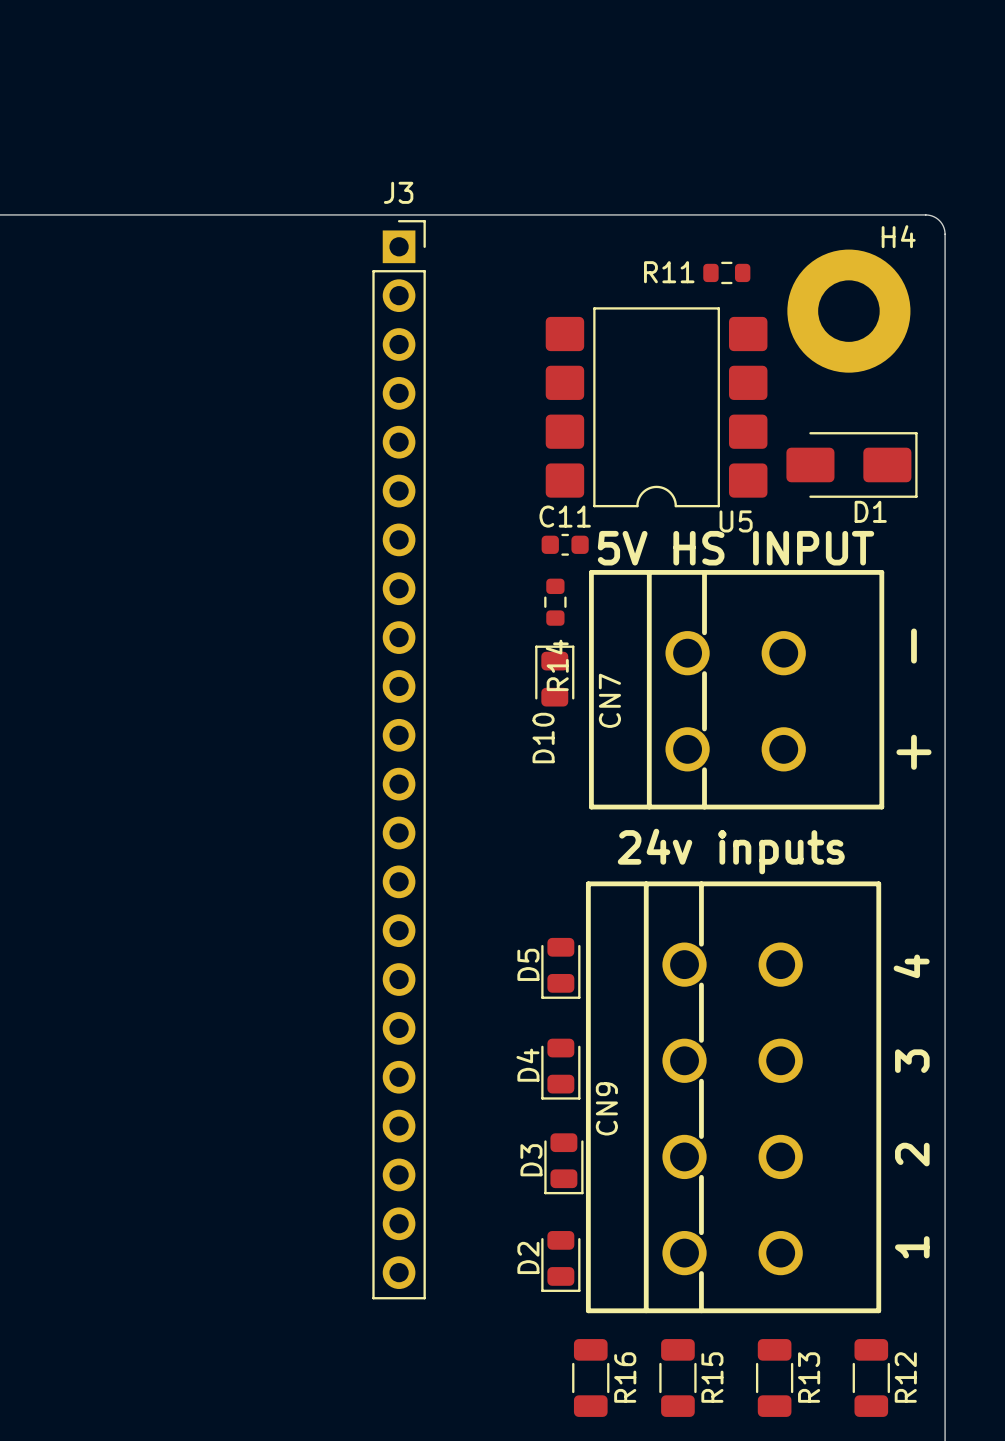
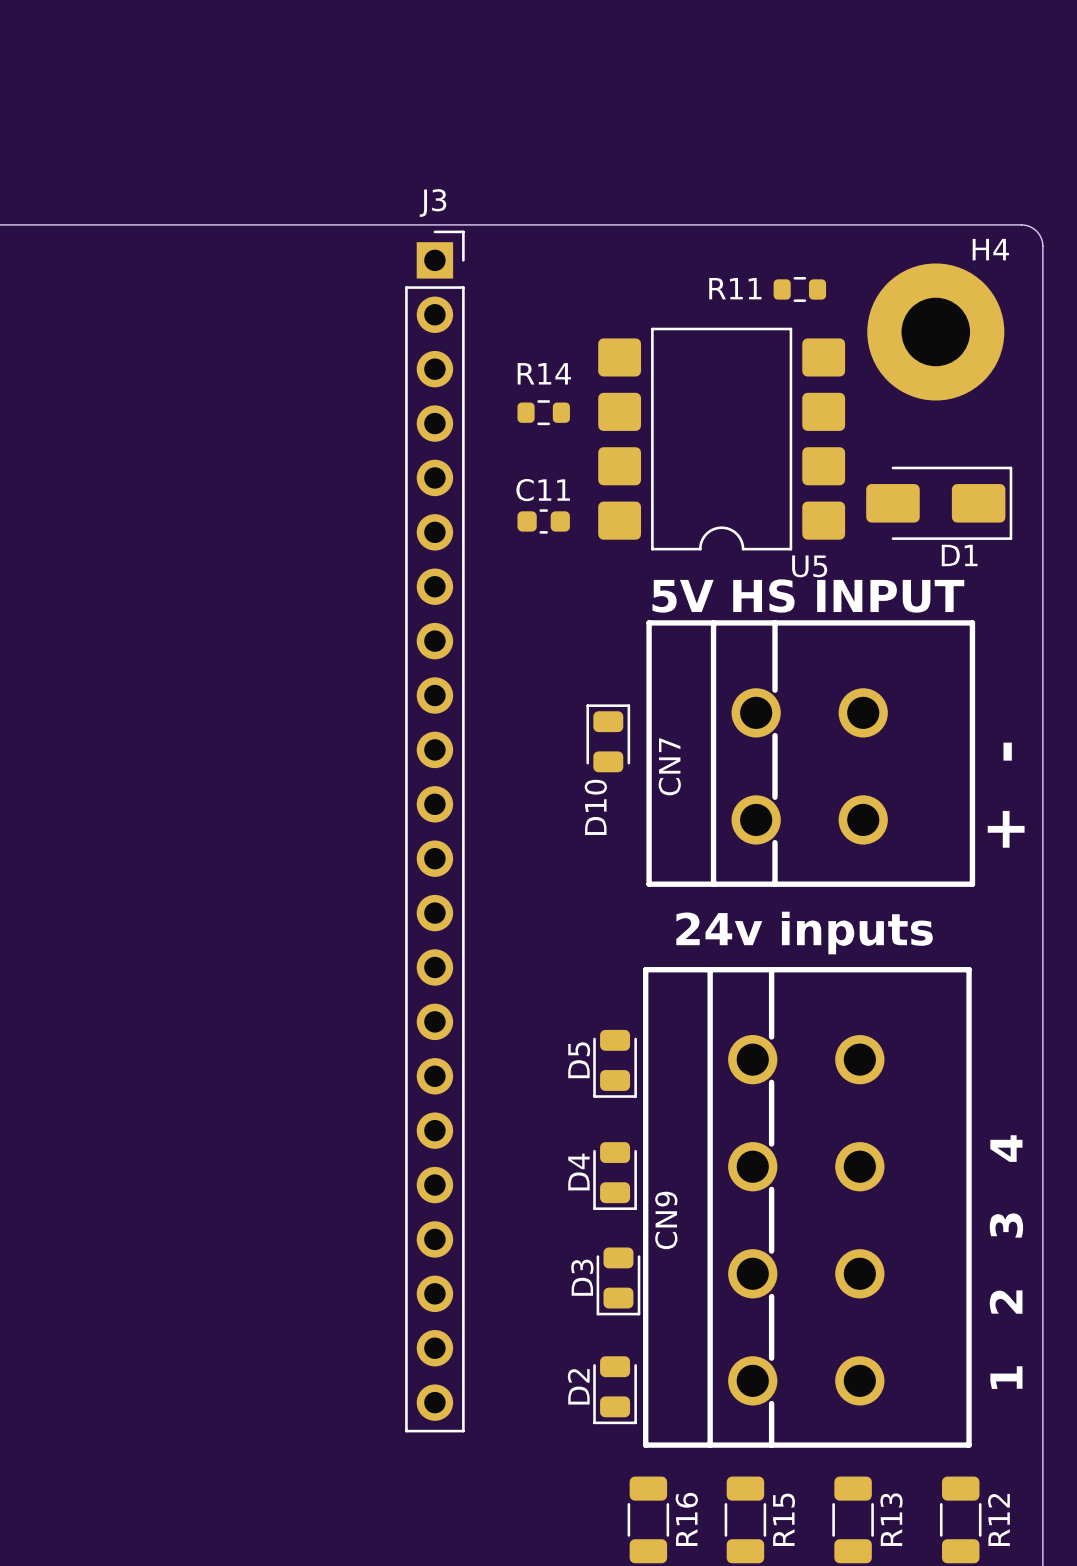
C11 position: (565, 544) -> (543, 521)
R14 rotation: 0° (555, 602) -> 90° clockwise (543, 412)
R14 position: (555, 602) -> (543, 412)
R14 name position: R14 (557, 665) -> R14 (544, 373)

